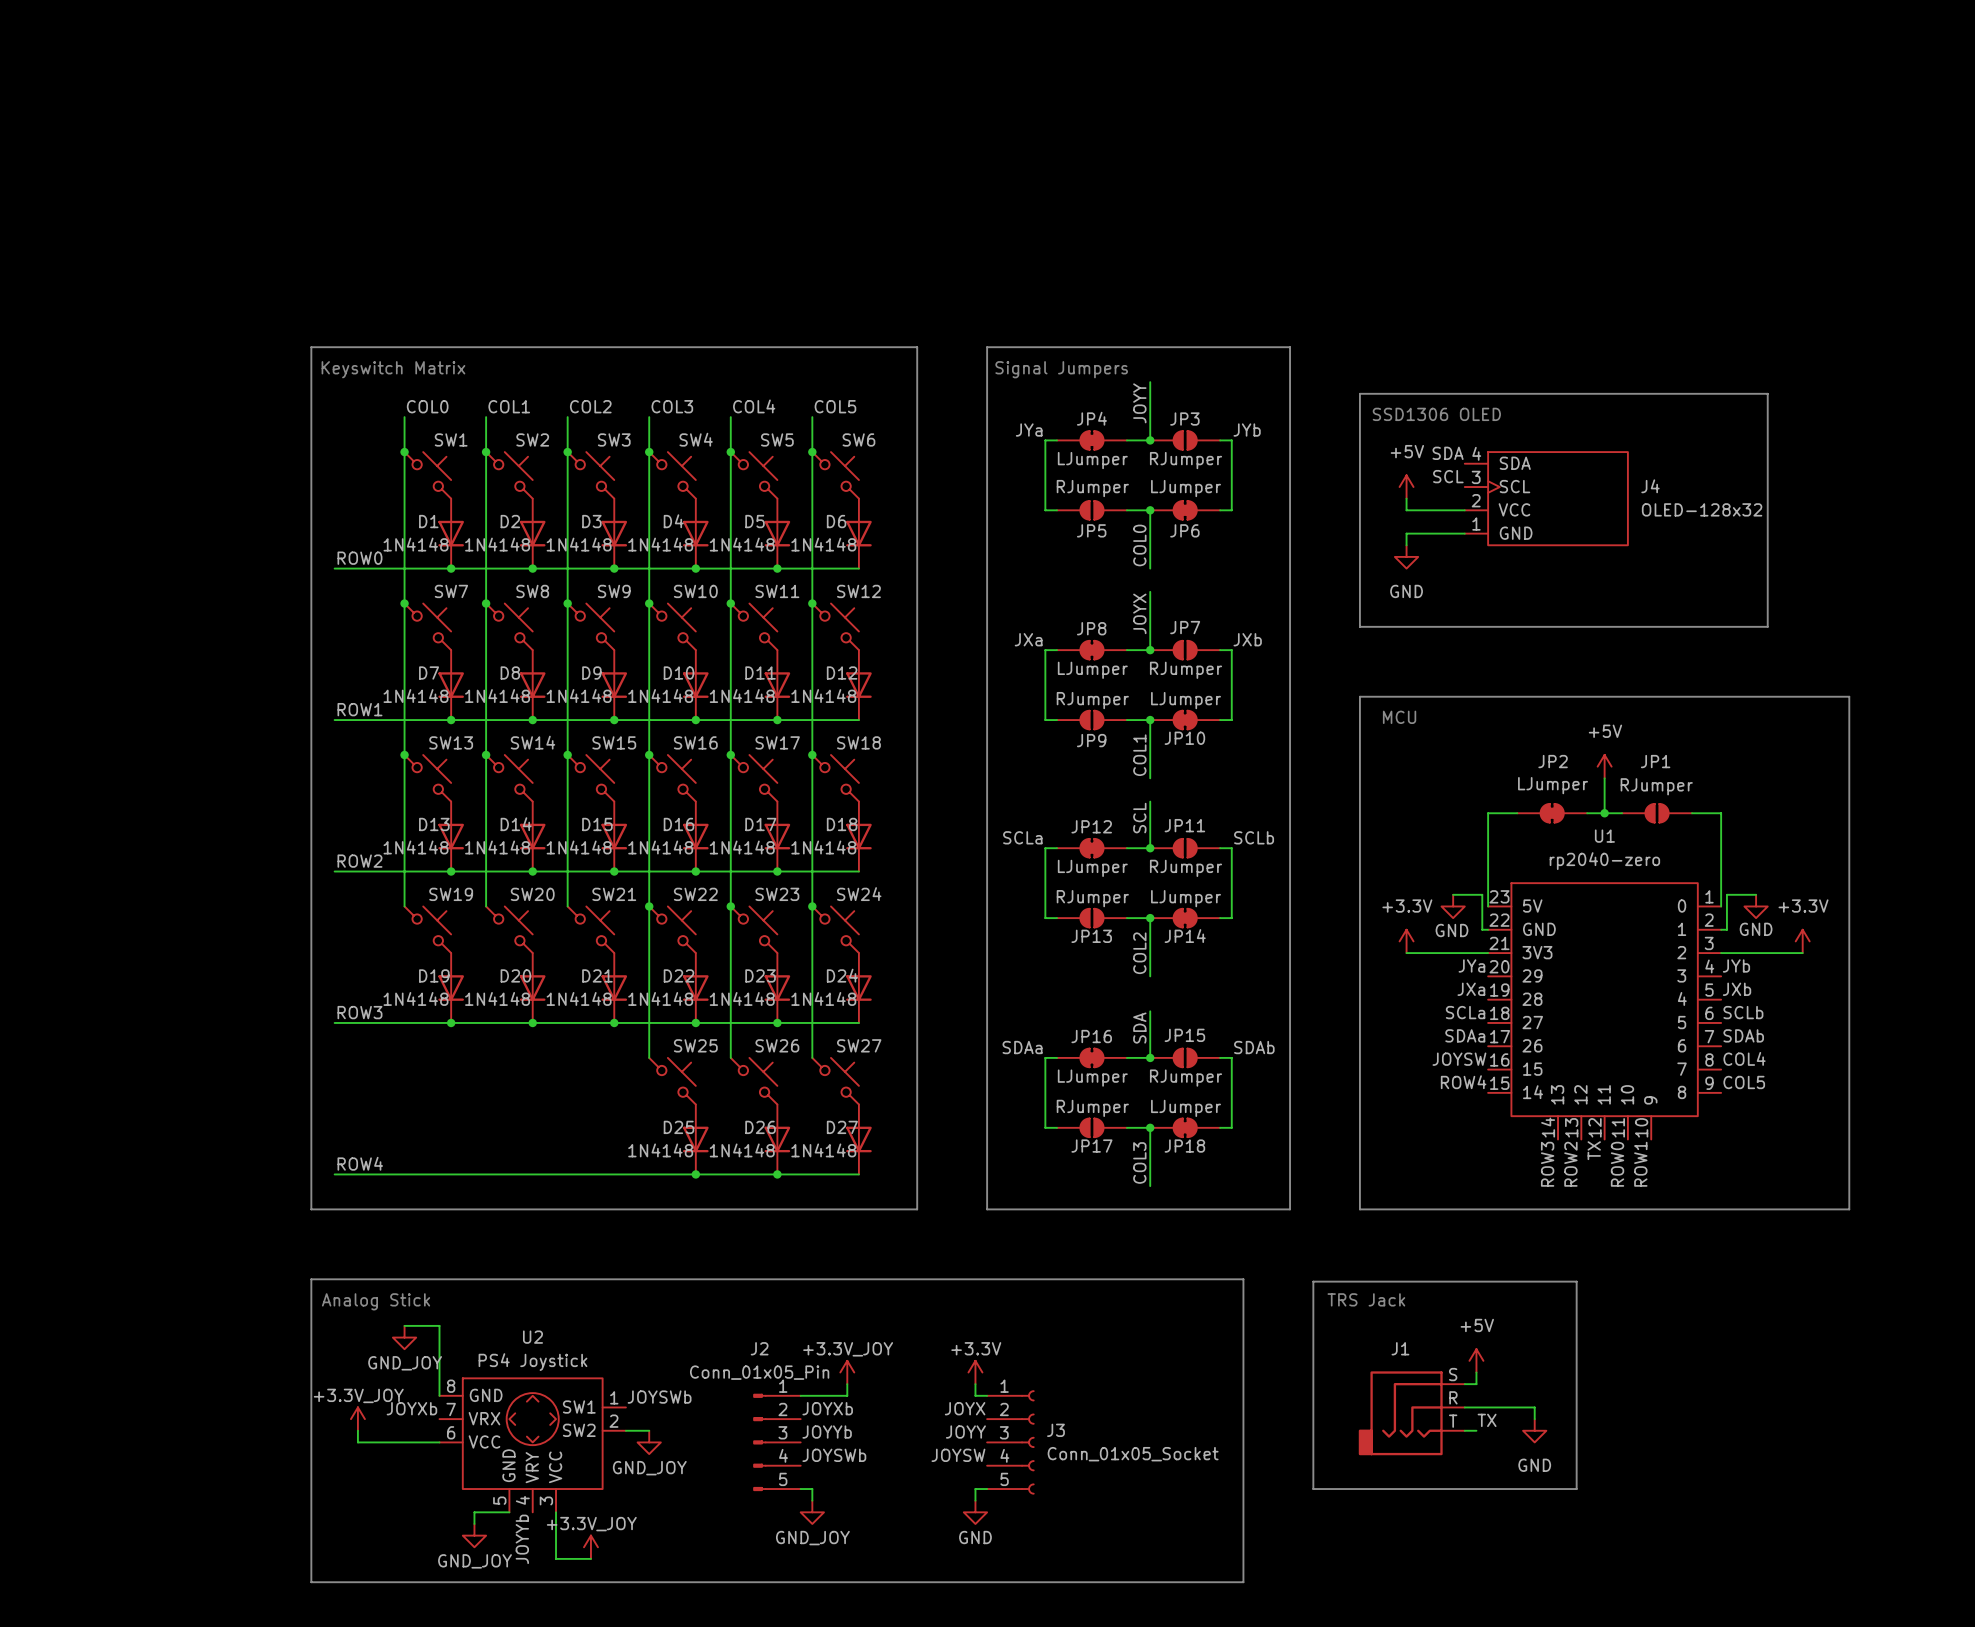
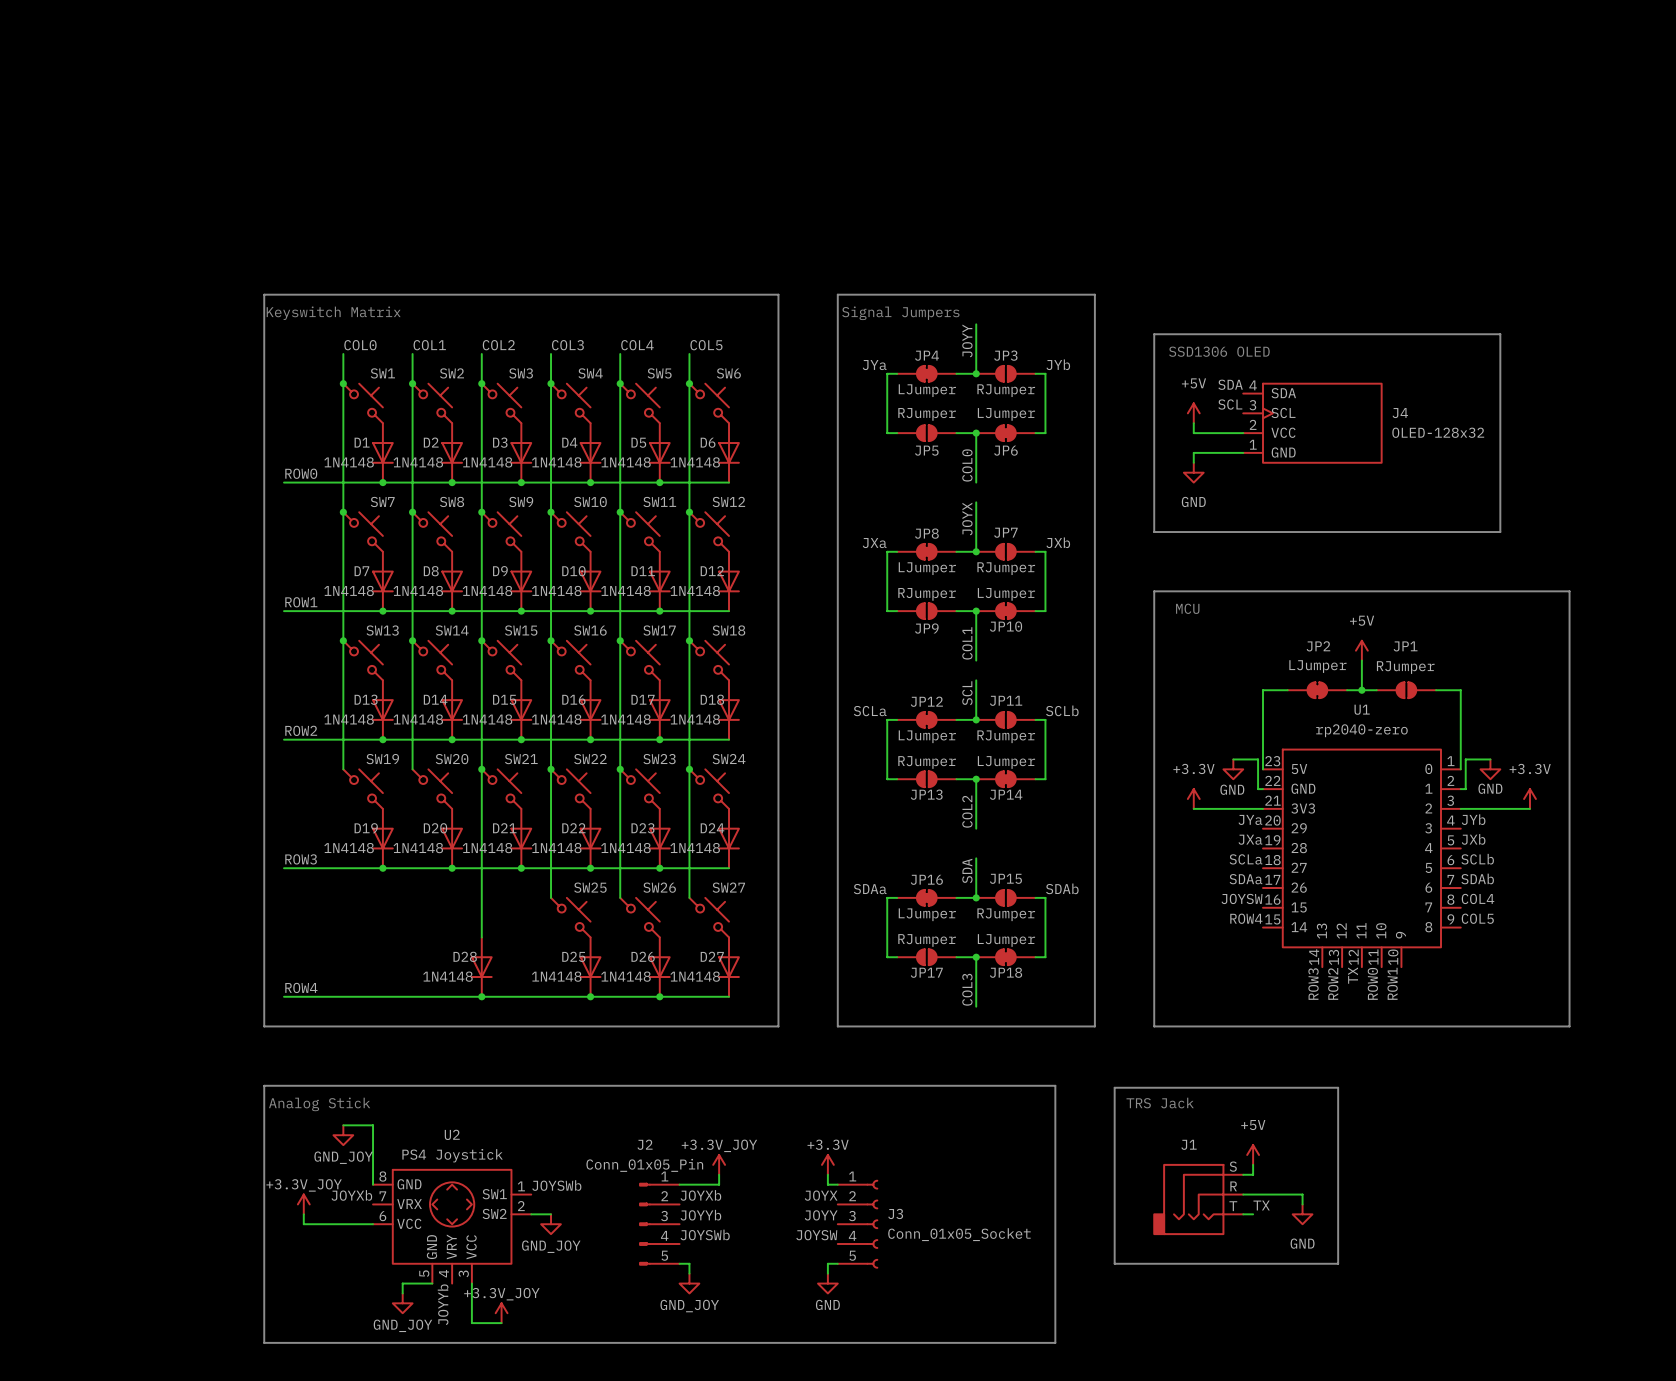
wire: none -> (481, 769) (481, 937)
junction: none -> (481, 769)
D28: none -> 1N4148 (481, 967)
junction: none -> (481, 996)

